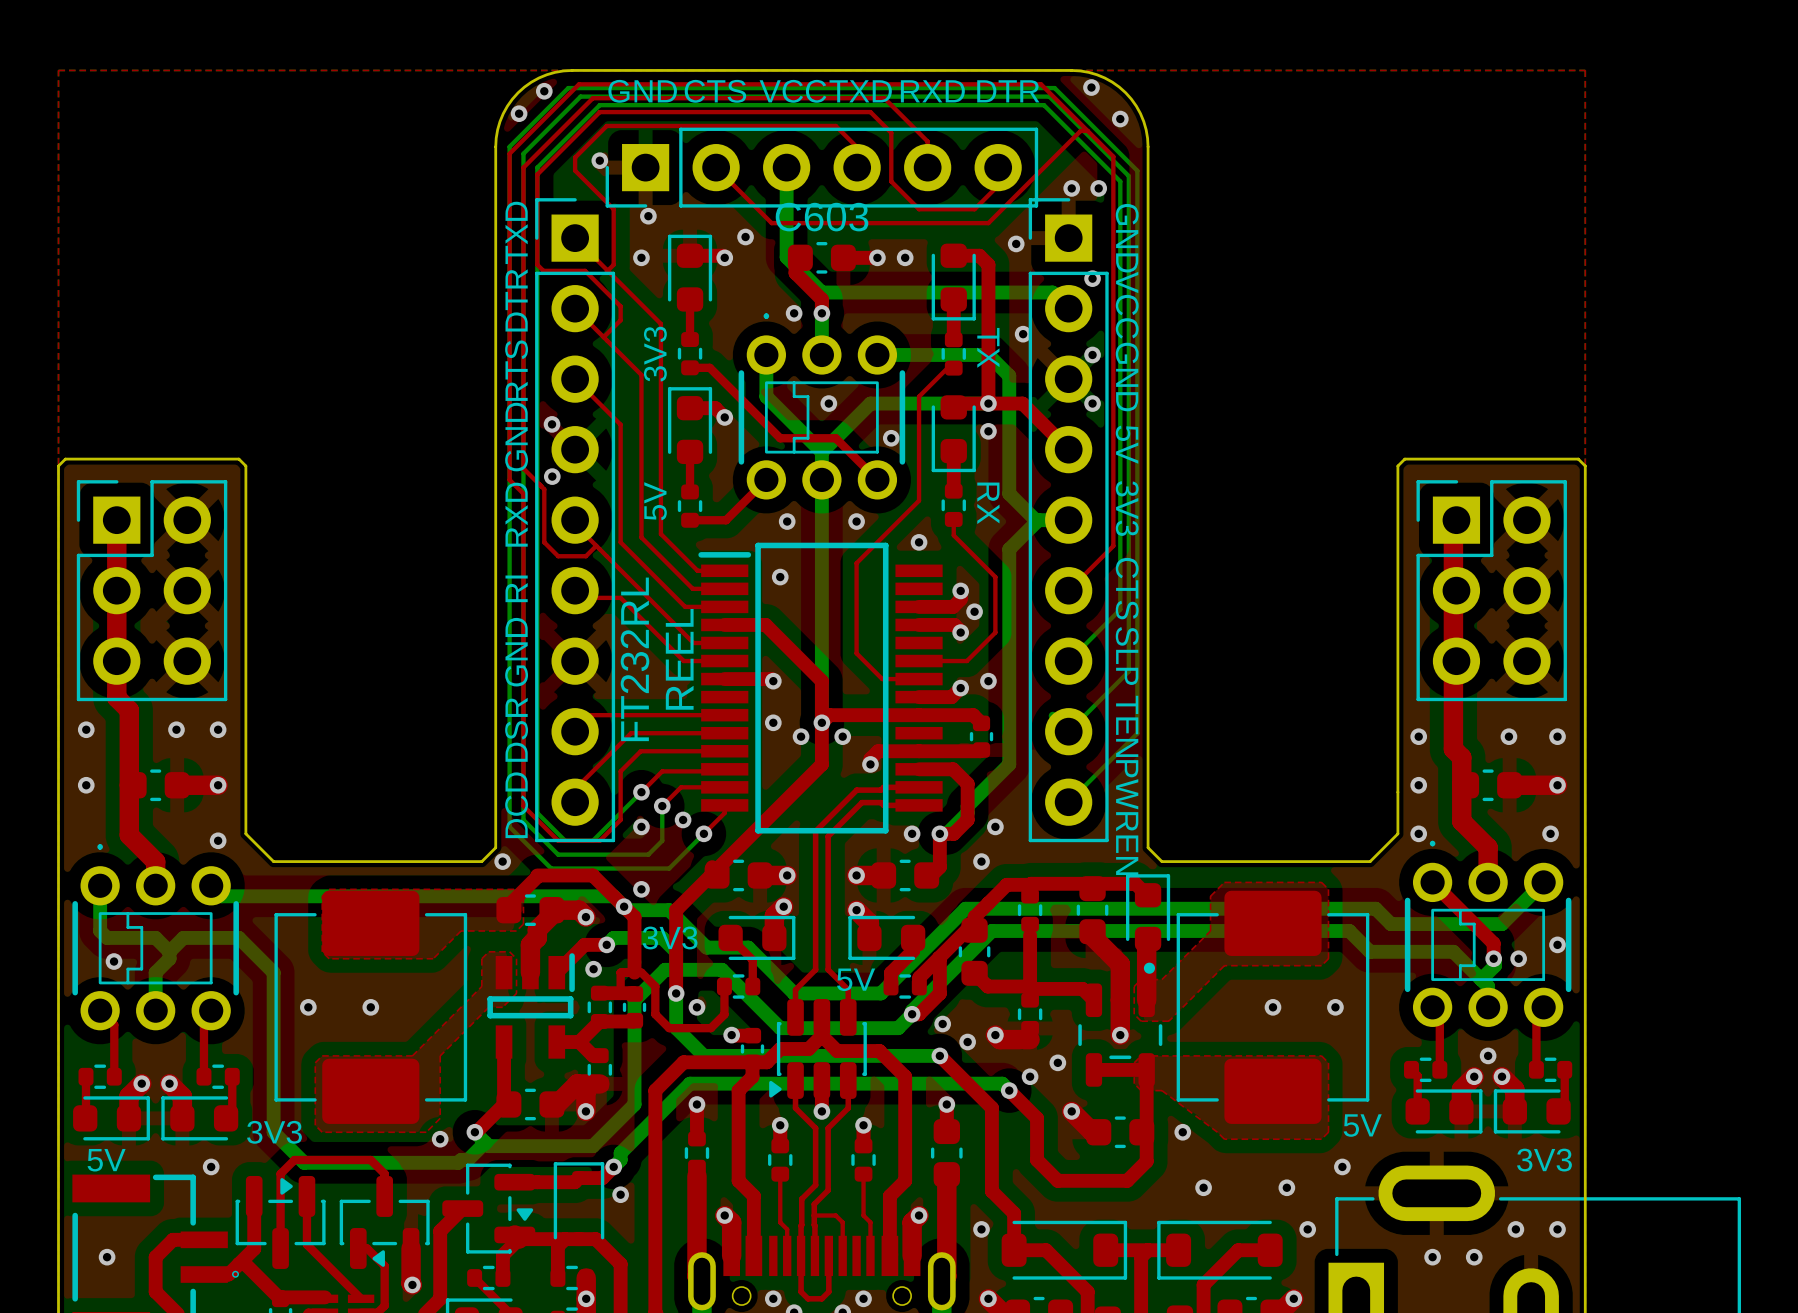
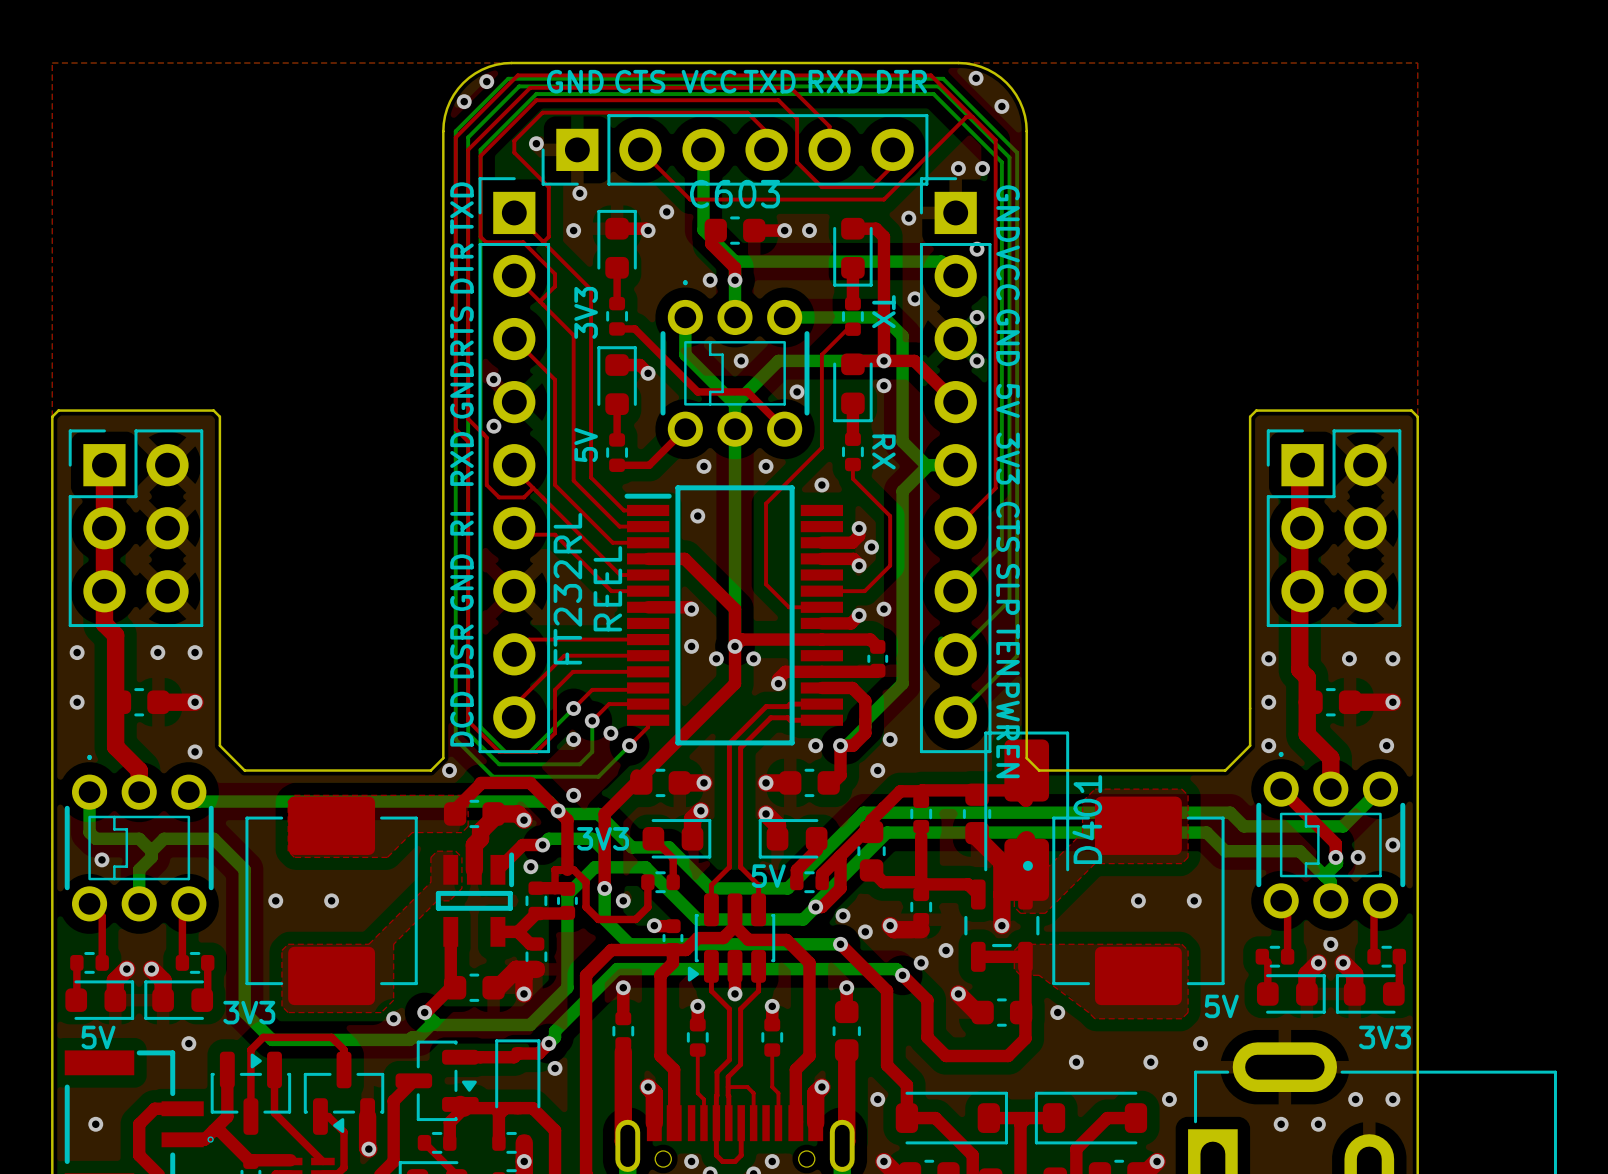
part: (1148, 912) -> none
D401: none -> (1026, 816)

